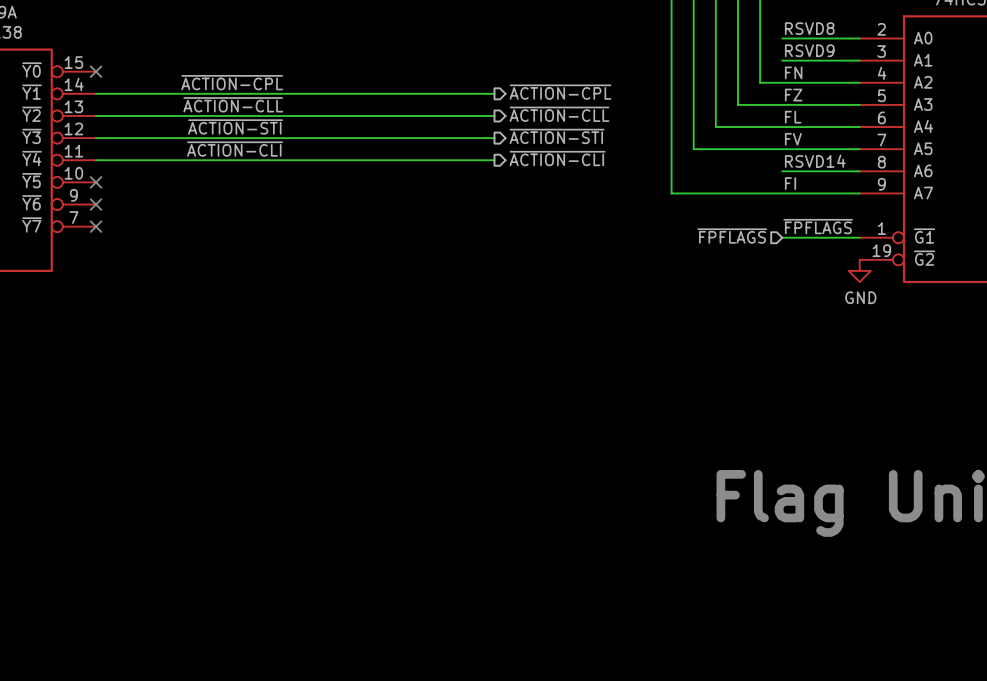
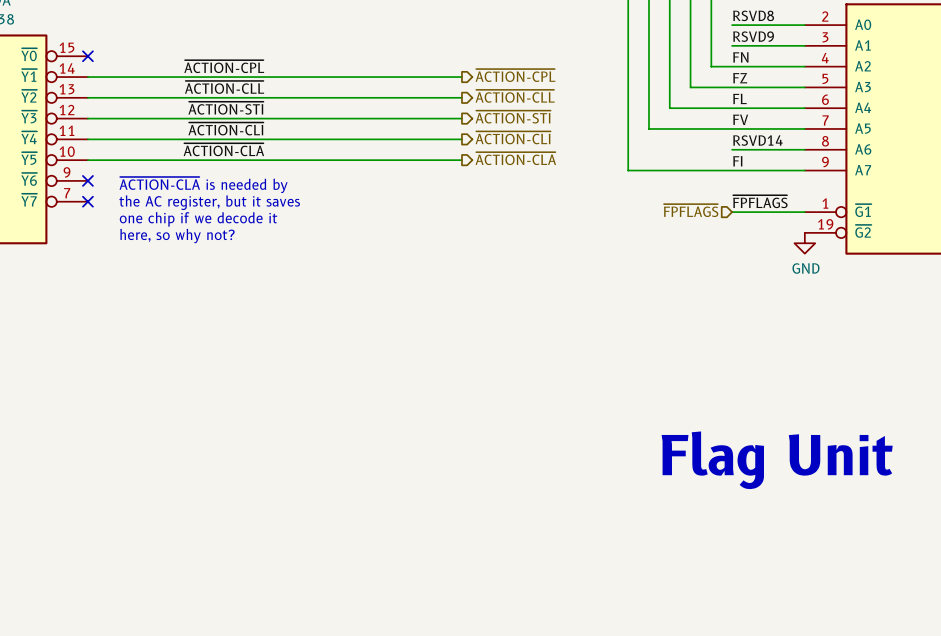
label: none -> ~{ACTION-CLA} (223, 149)
hierarchical label: none -> ~{ACTION-CLA} (515, 158)
wire: none -> (87, 160) (461, 160)
no-connect mark: (96, 182) -> none
text: none -> ~{ACTION-CLA} is needed by (203, 185)
text: none -> the AC register, but it saves (209, 202)
text: none -> one chip if we decode it (198, 219)
text: none -> here, so why not? (177, 236)

